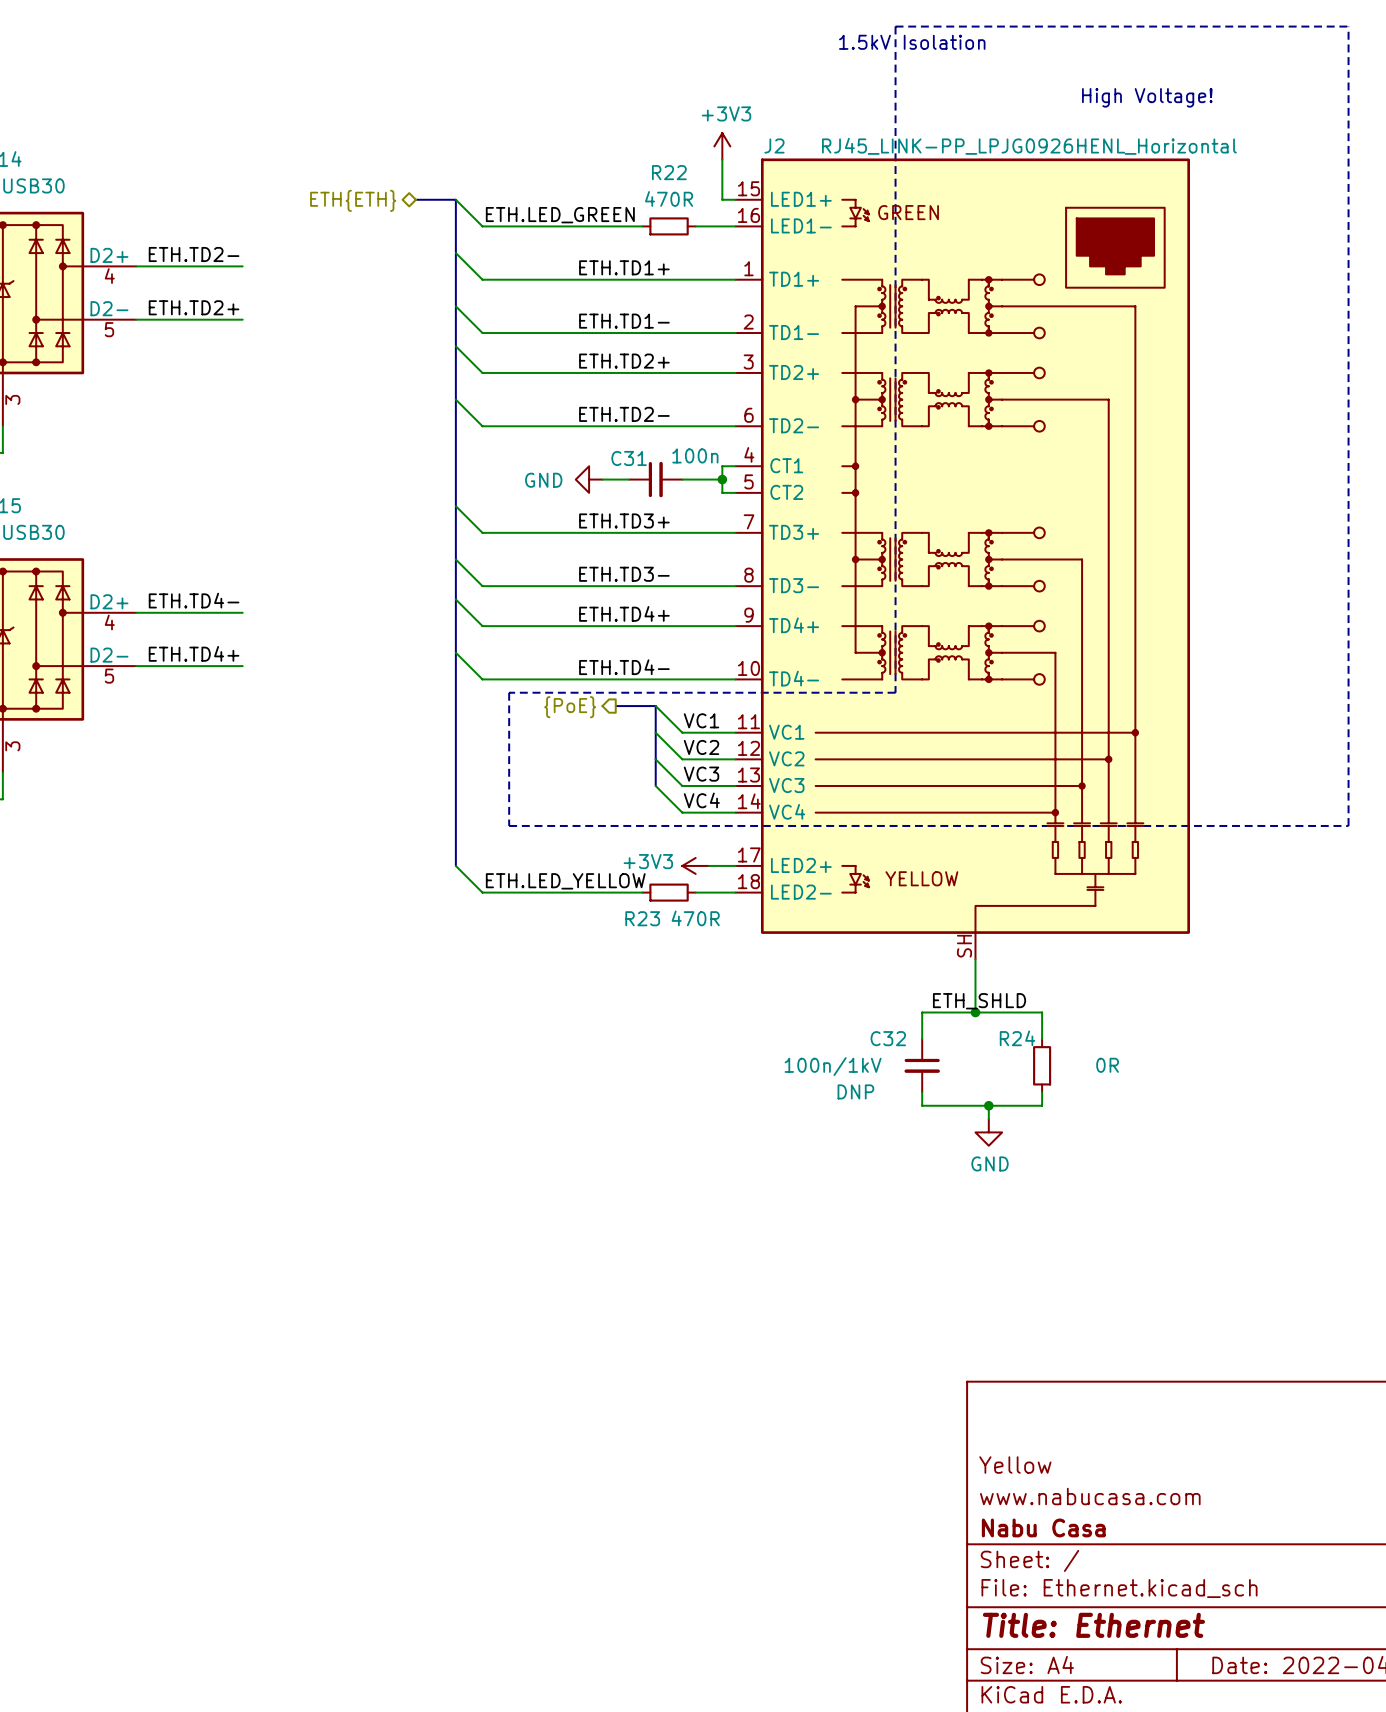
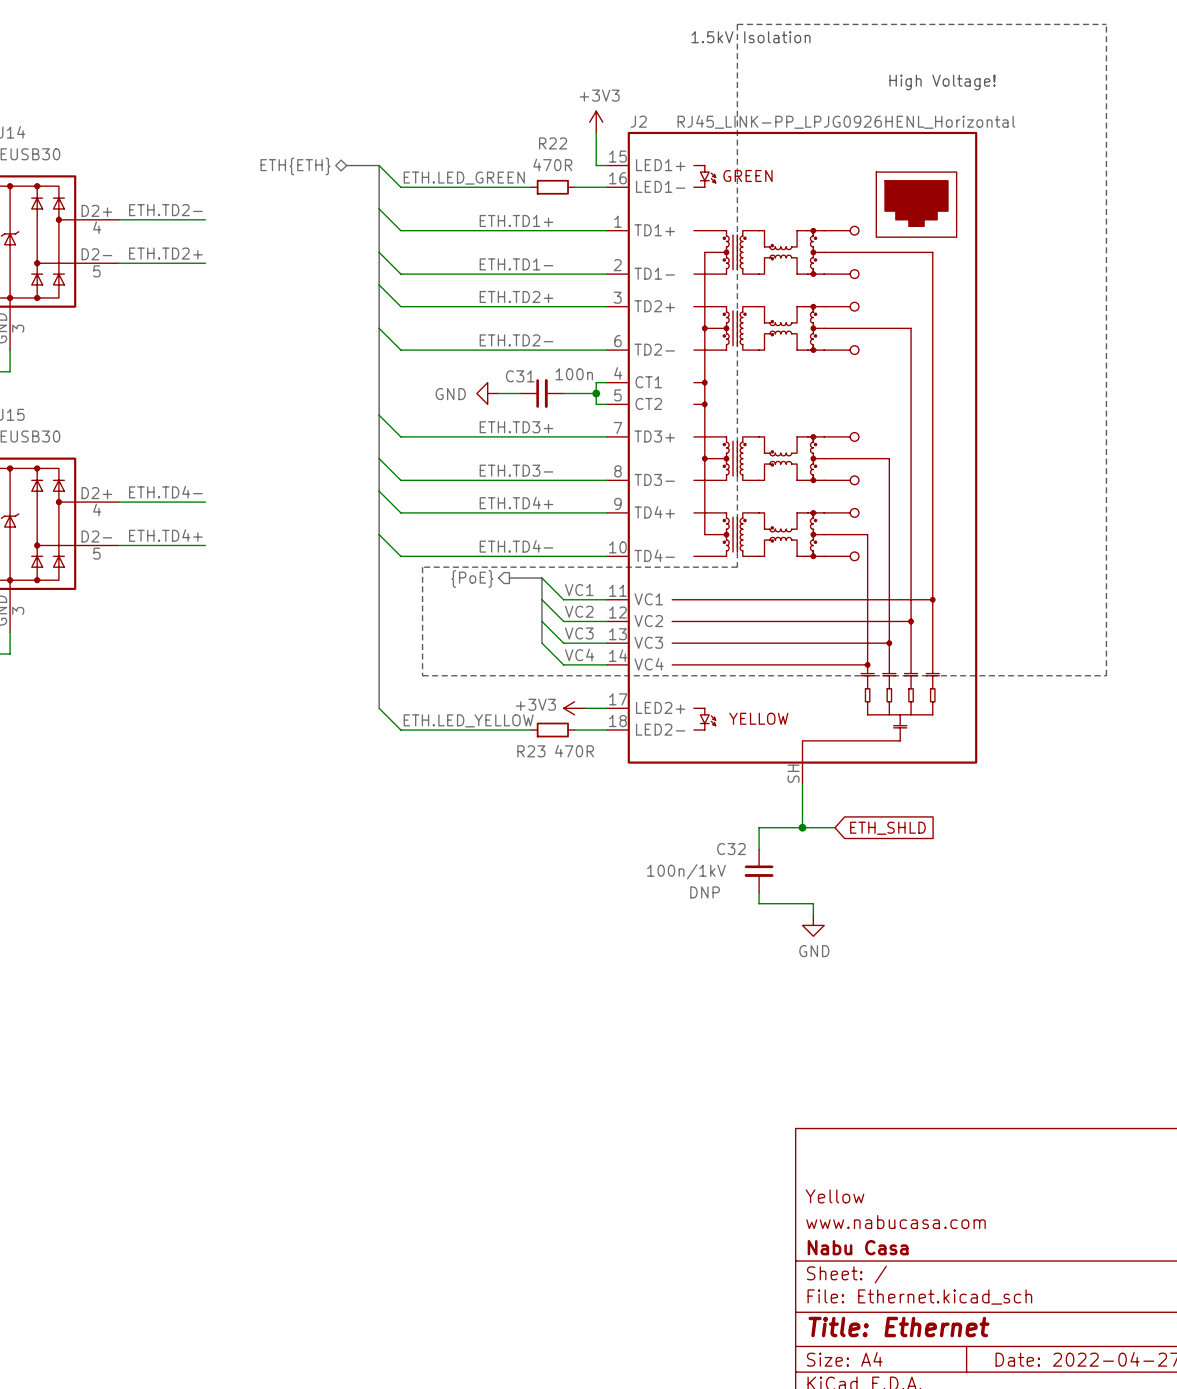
label: ETH_SHLD (979, 1001) -> none
wire: (1015, 1012) (1042, 1012) (1042, 1039) -> none
global label: none -> ETH_SHLD (887, 828)
R24: 0R (1042, 1065) -> none
wire: (1042, 1092) (1042, 1105) (988, 1105) -> none
junction: (988, 1105) -> none

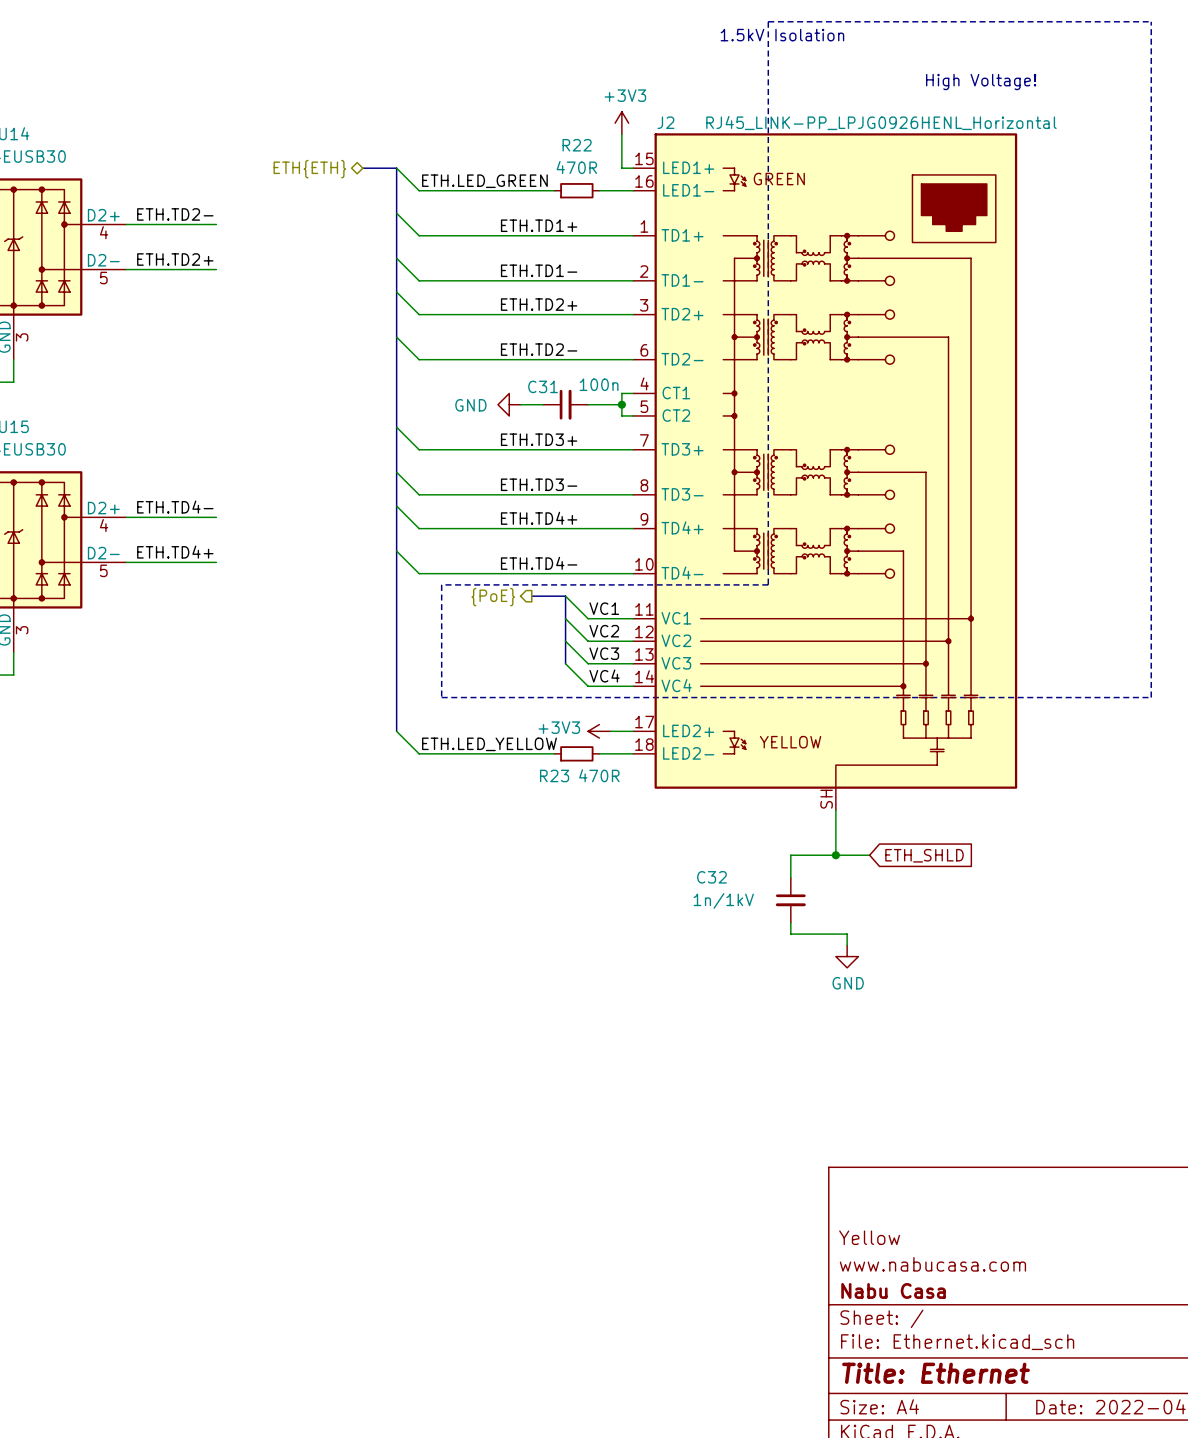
C32 name position: C32 (731, 849) -> C32 (711, 877)
C32 value: 100n/1kV (686, 871) -> 1n/1kV (723, 900)
C32 text: DNP (705, 892) -> none

